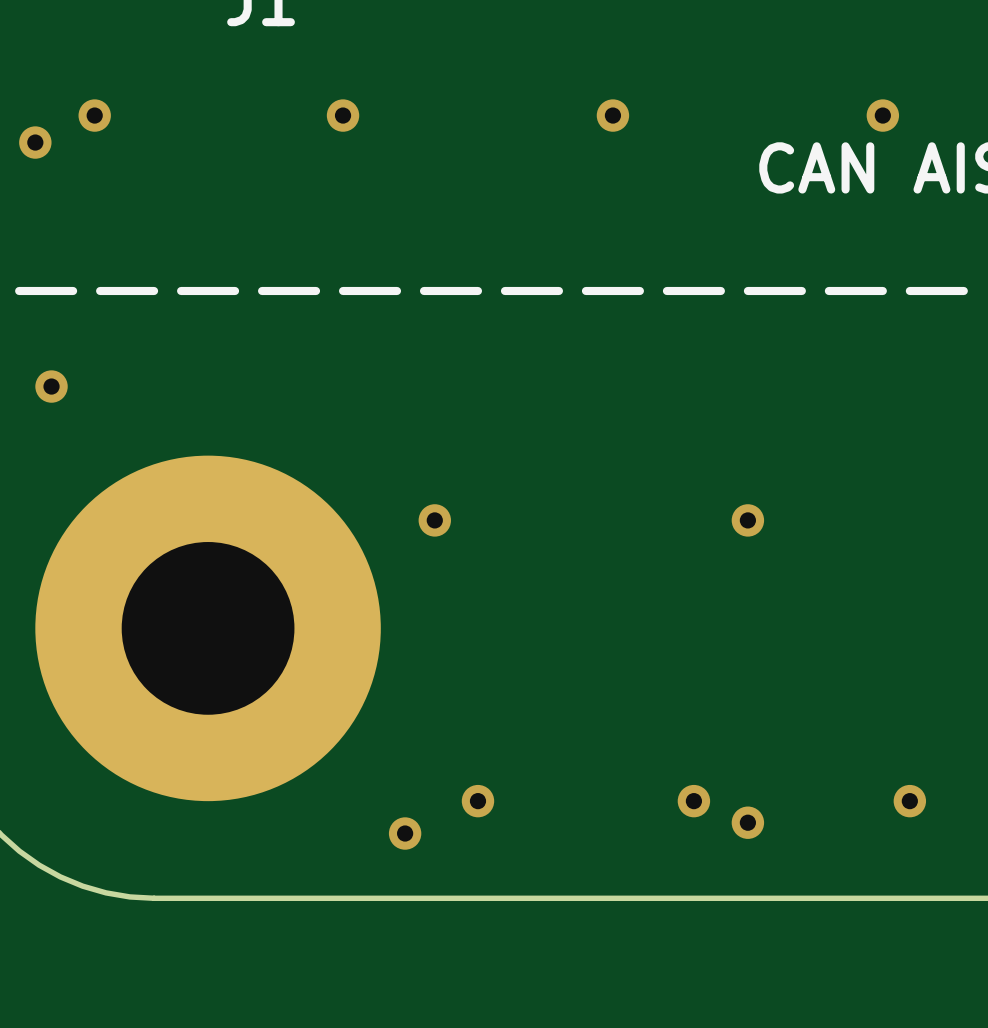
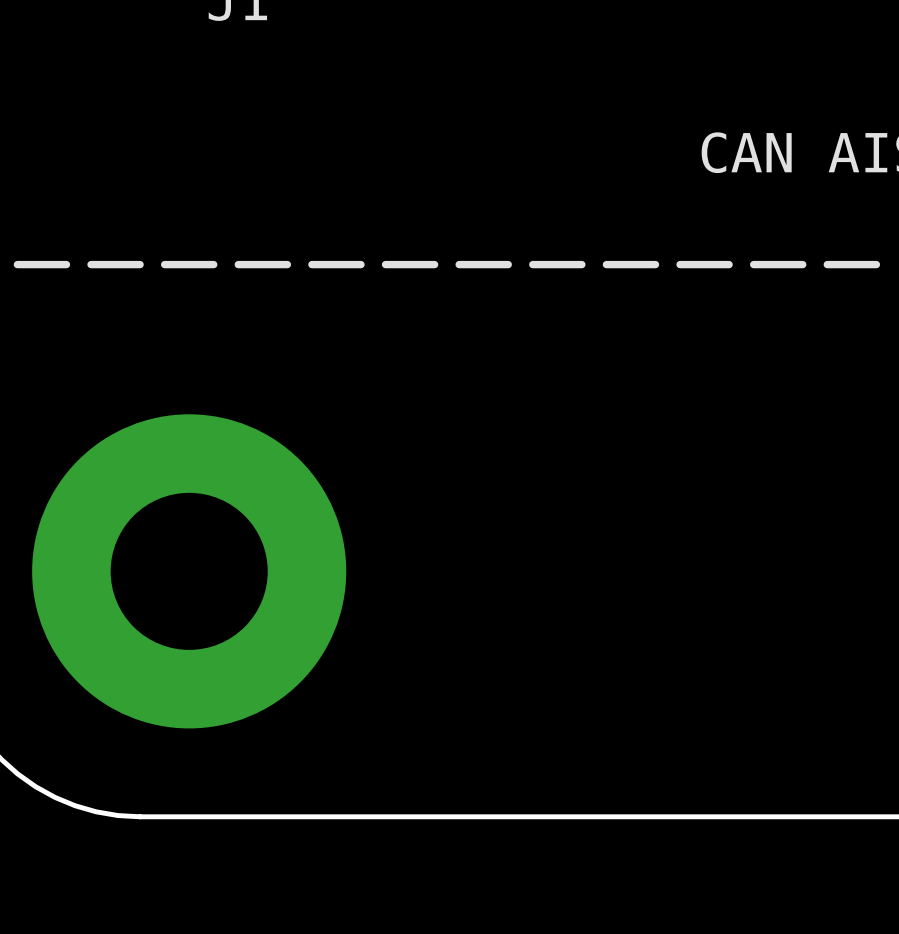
via: (94, 115) -> none
via: (343, 115) -> none
via: (612, 115) -> none
via: (882, 115) -> none
via: (35, 142) -> none
via: (51, 386) -> none
via: (434, 520) -> none
via: (747, 520) -> none
via: (477, 801) -> none
via: (693, 801) -> none
via: (909, 801) -> none
via: (747, 822) -> none
via: (405, 833) -> none

